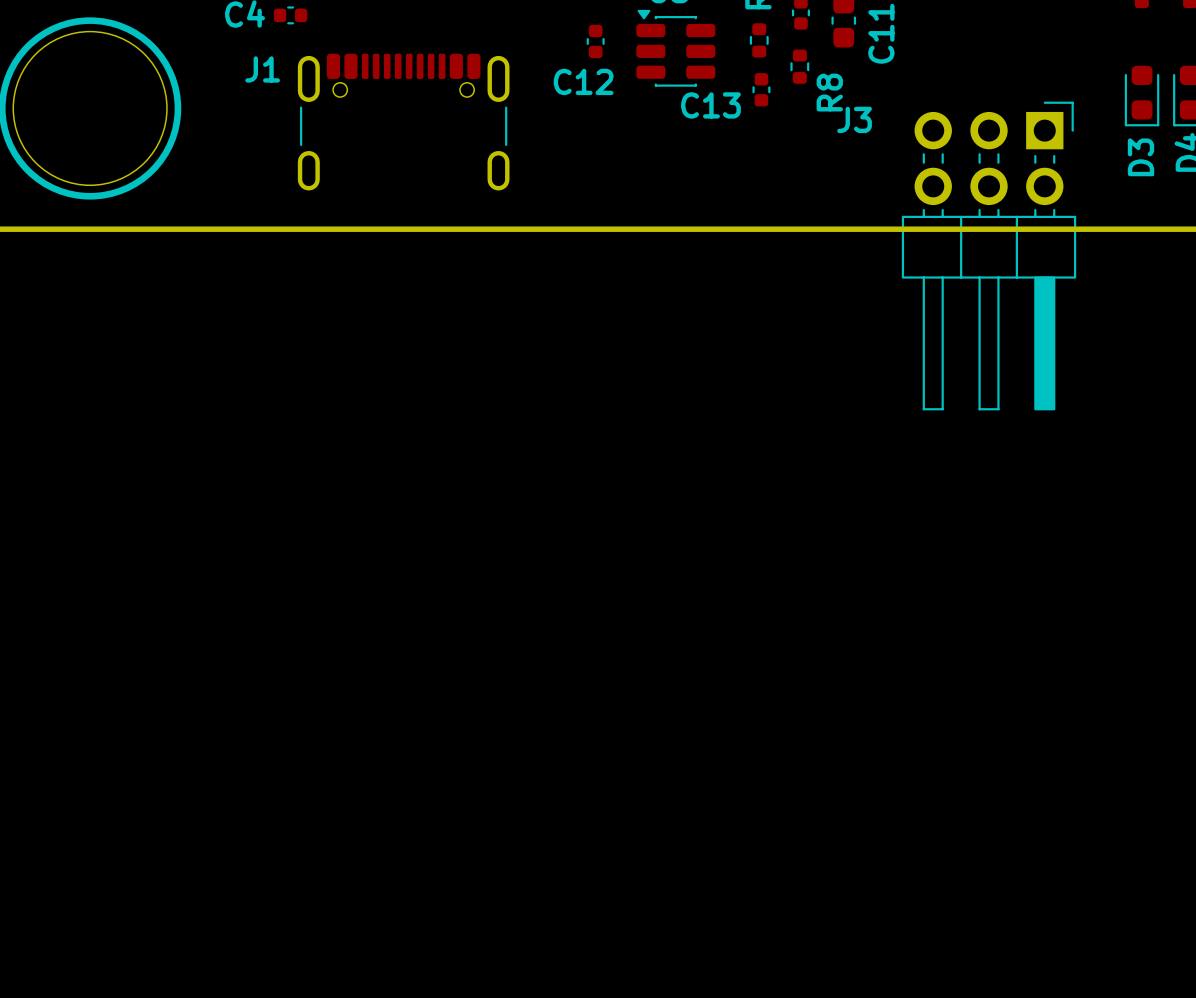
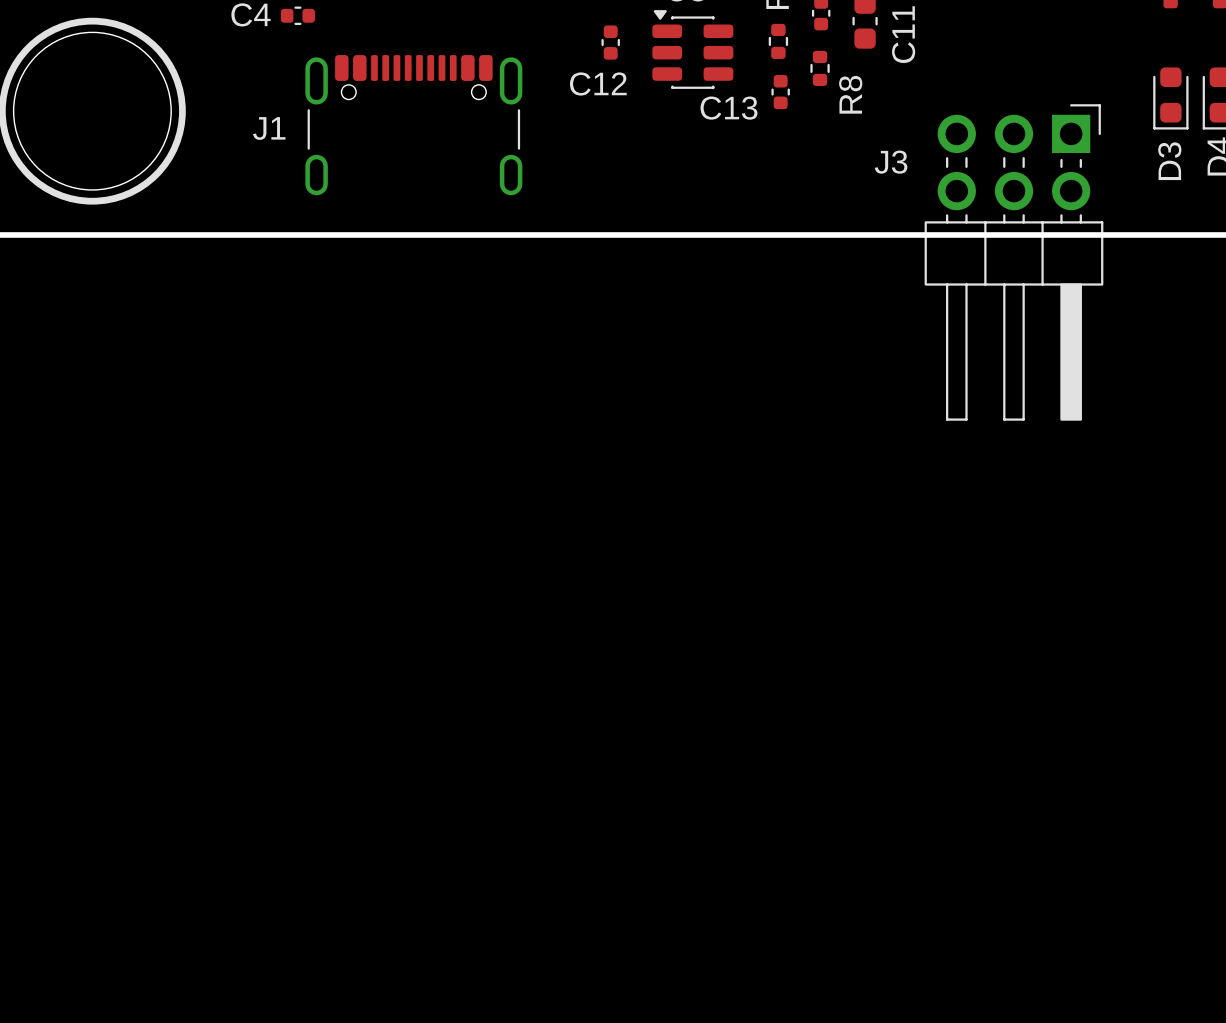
J1 name position: J1 (262, 69) -> J1 (269, 128)
J3 name position: J3 (854, 119) -> J3 (891, 162)

